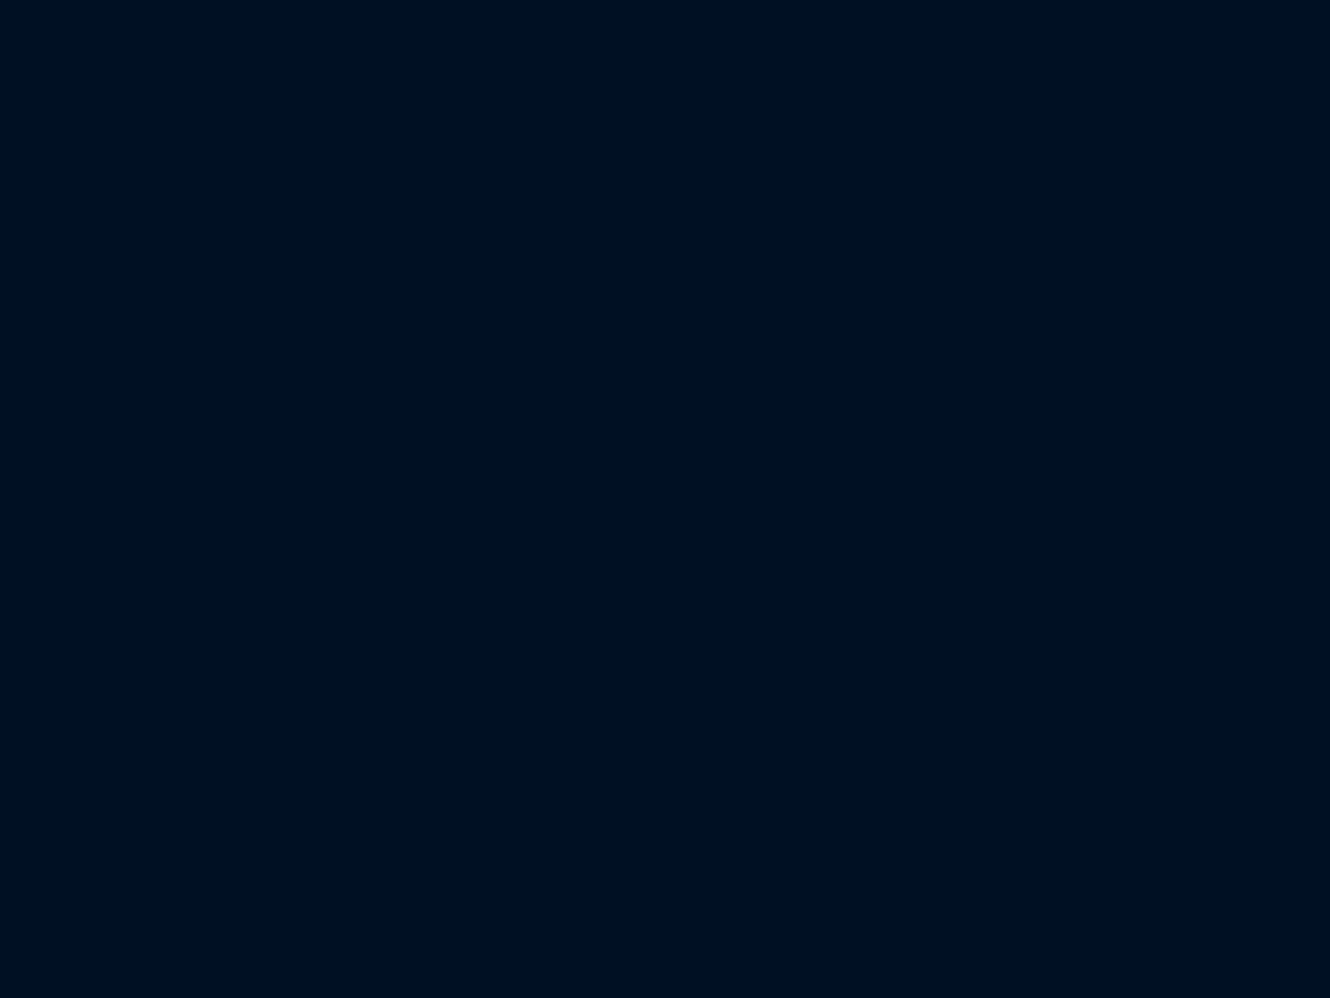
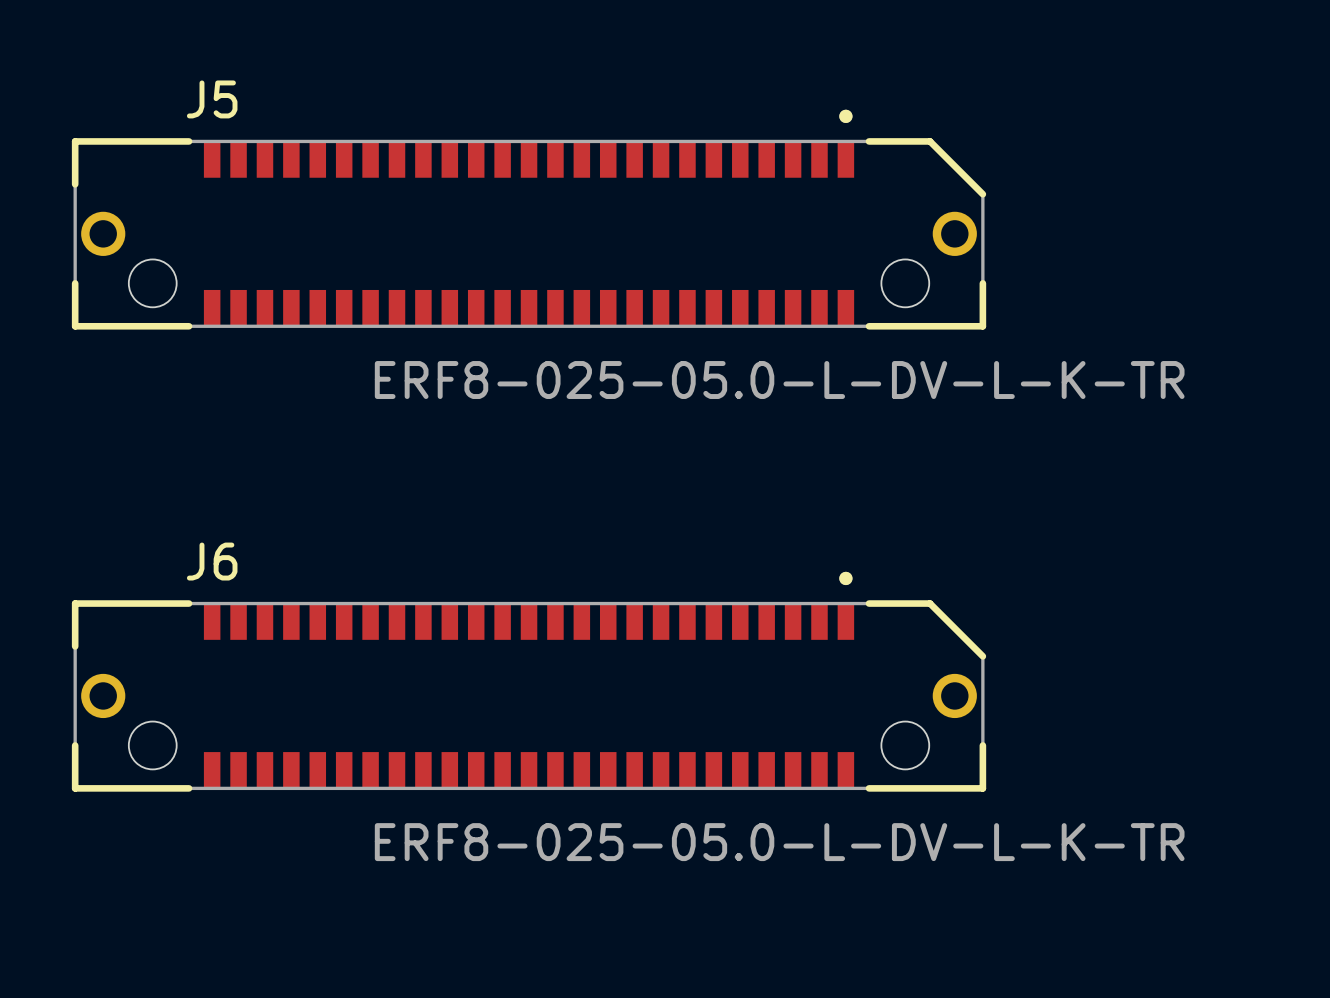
J5: none -> ERF8-025-05.0-L-DV-L-K-TR (529, 219)
J6: none -> ERF8-025-05.0-L-DV-L-K-TR (529, 681)

